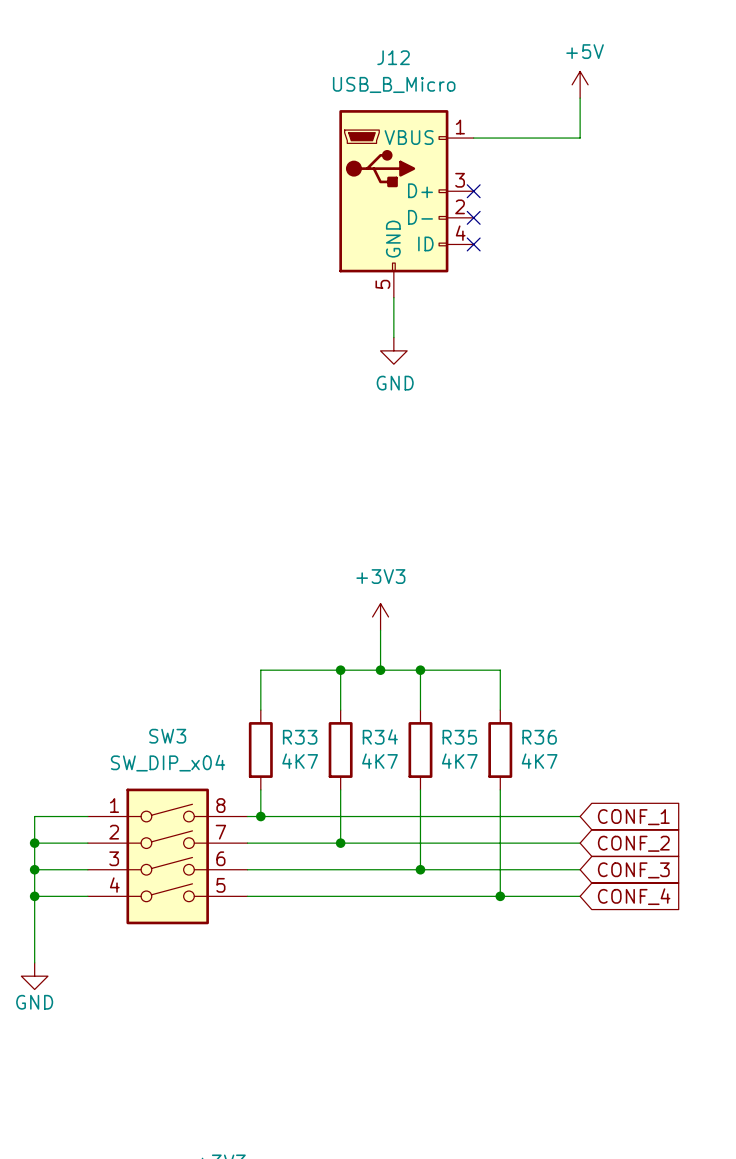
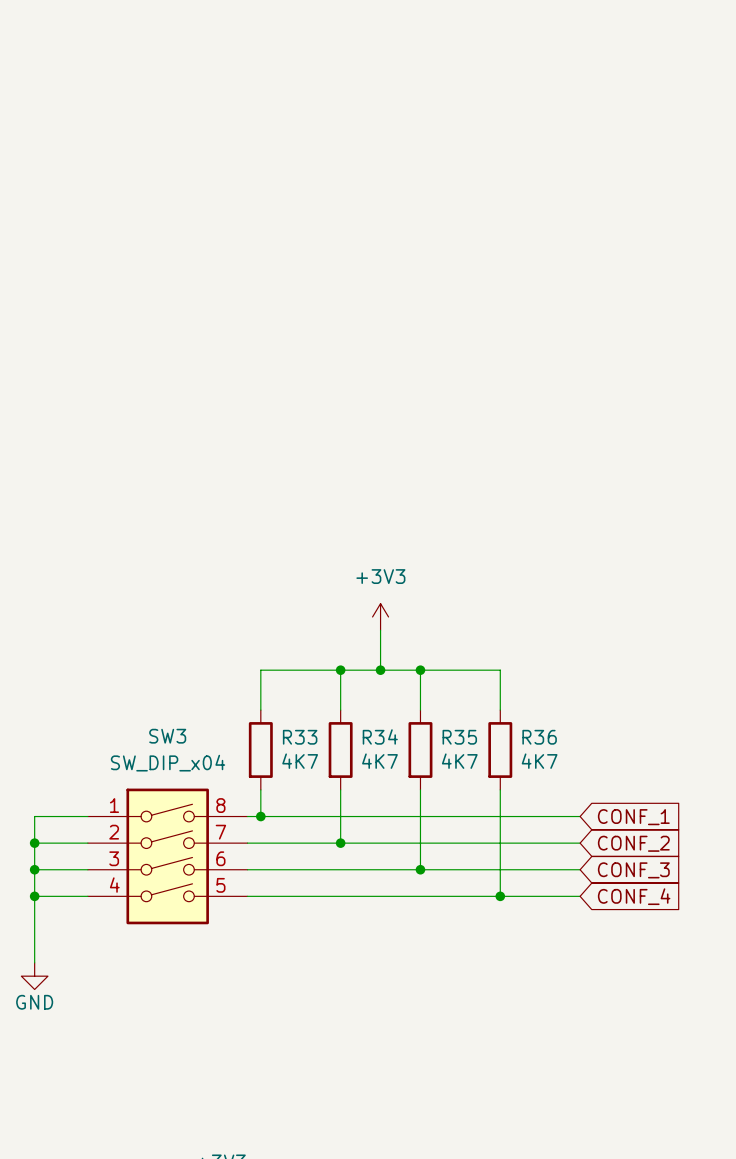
power symbol: +5V (580, 84) -> none
wire: (580, 98) (580, 138) (473, 138) -> none
no-connect mark: (473, 191) -> none
J12: USB_B_Micro (406, 203) -> none
no-connect mark: (473, 217) -> none
no-connect mark: (473, 244) -> none
wire: (393, 297) (393, 337) -> none
power symbol: GND (393, 350) -> none

